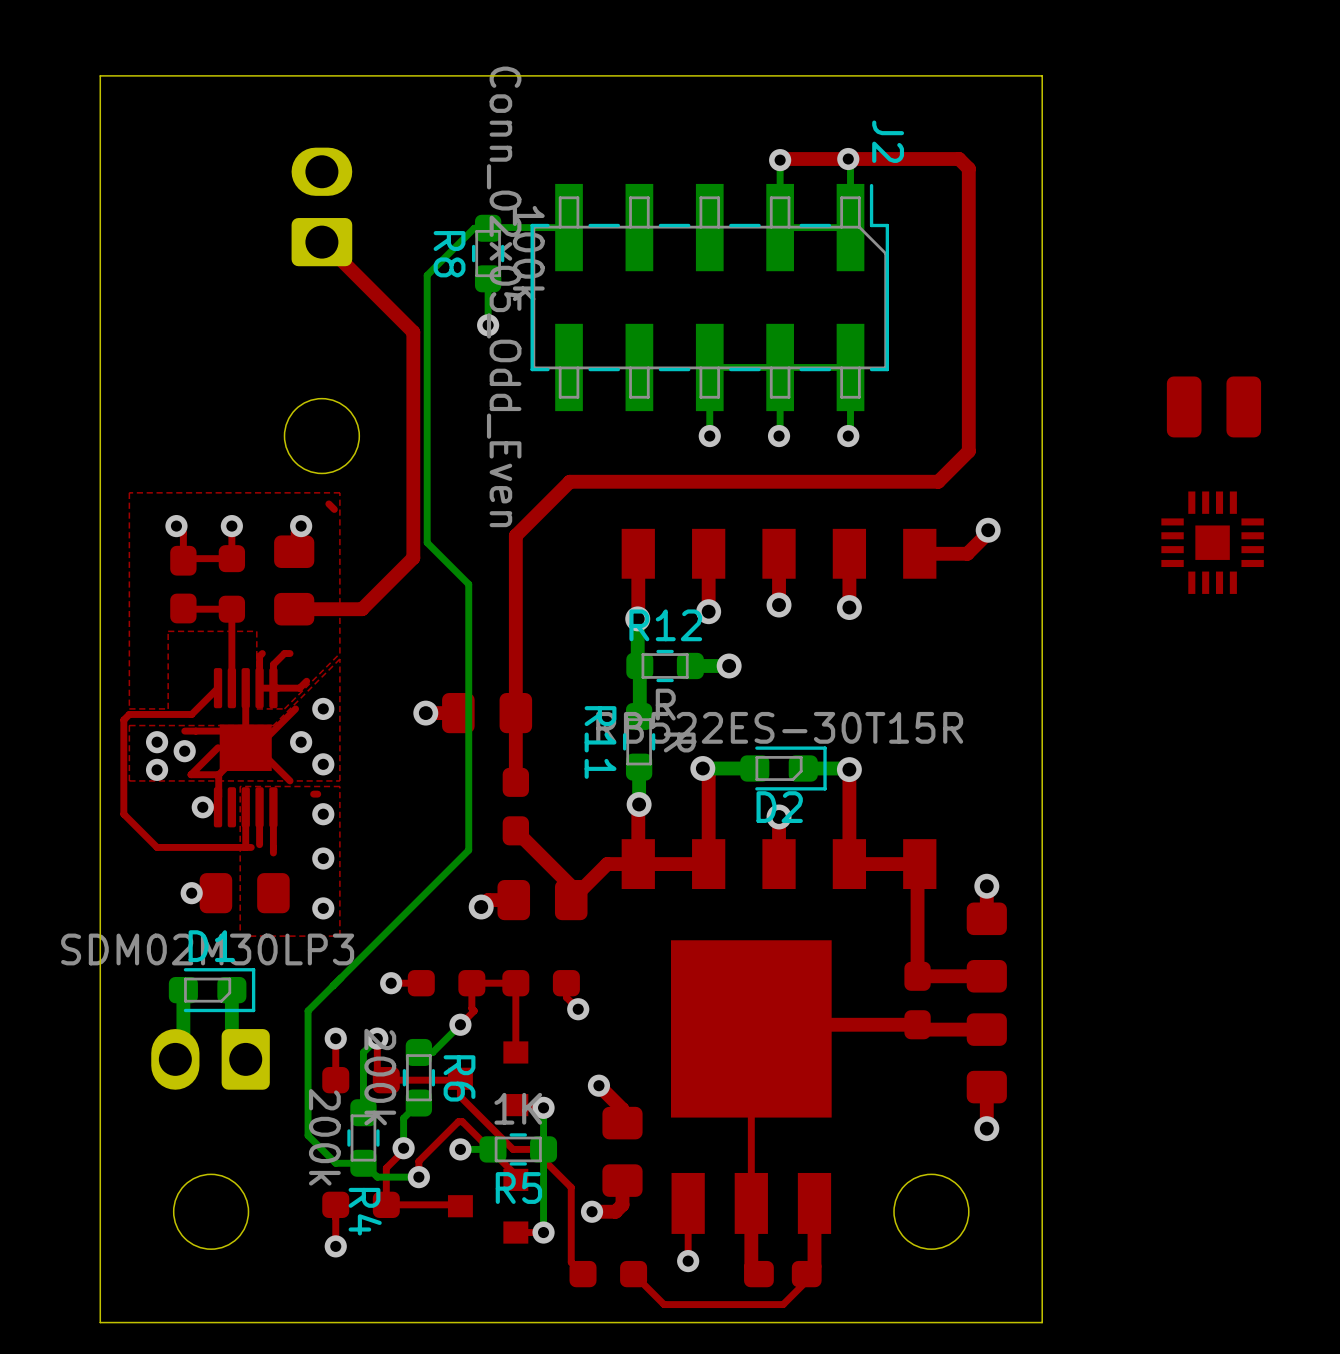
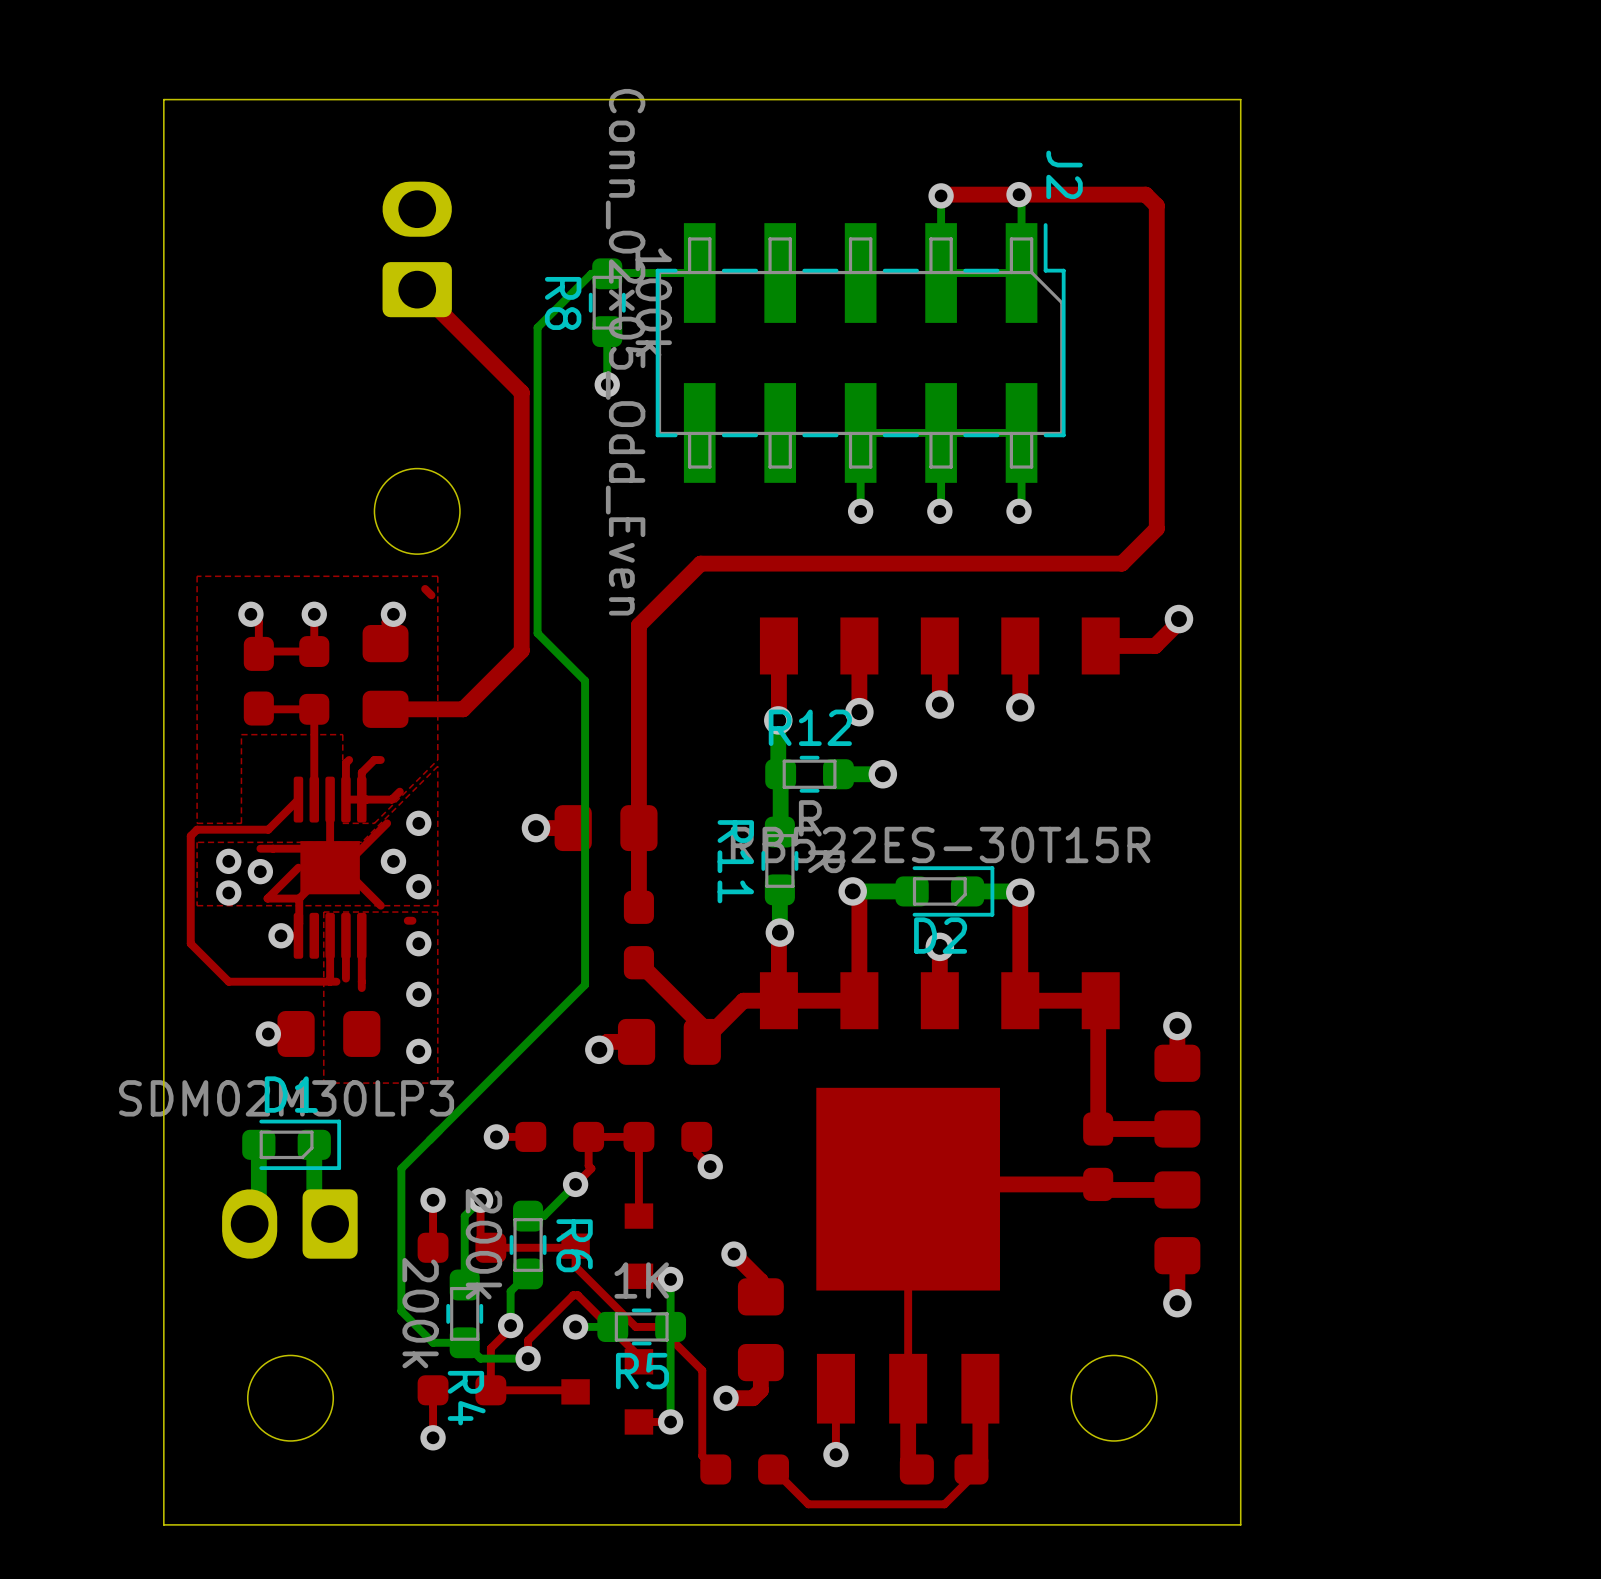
part: (1213, 406) -> none
part: (1212, 542) -> none

